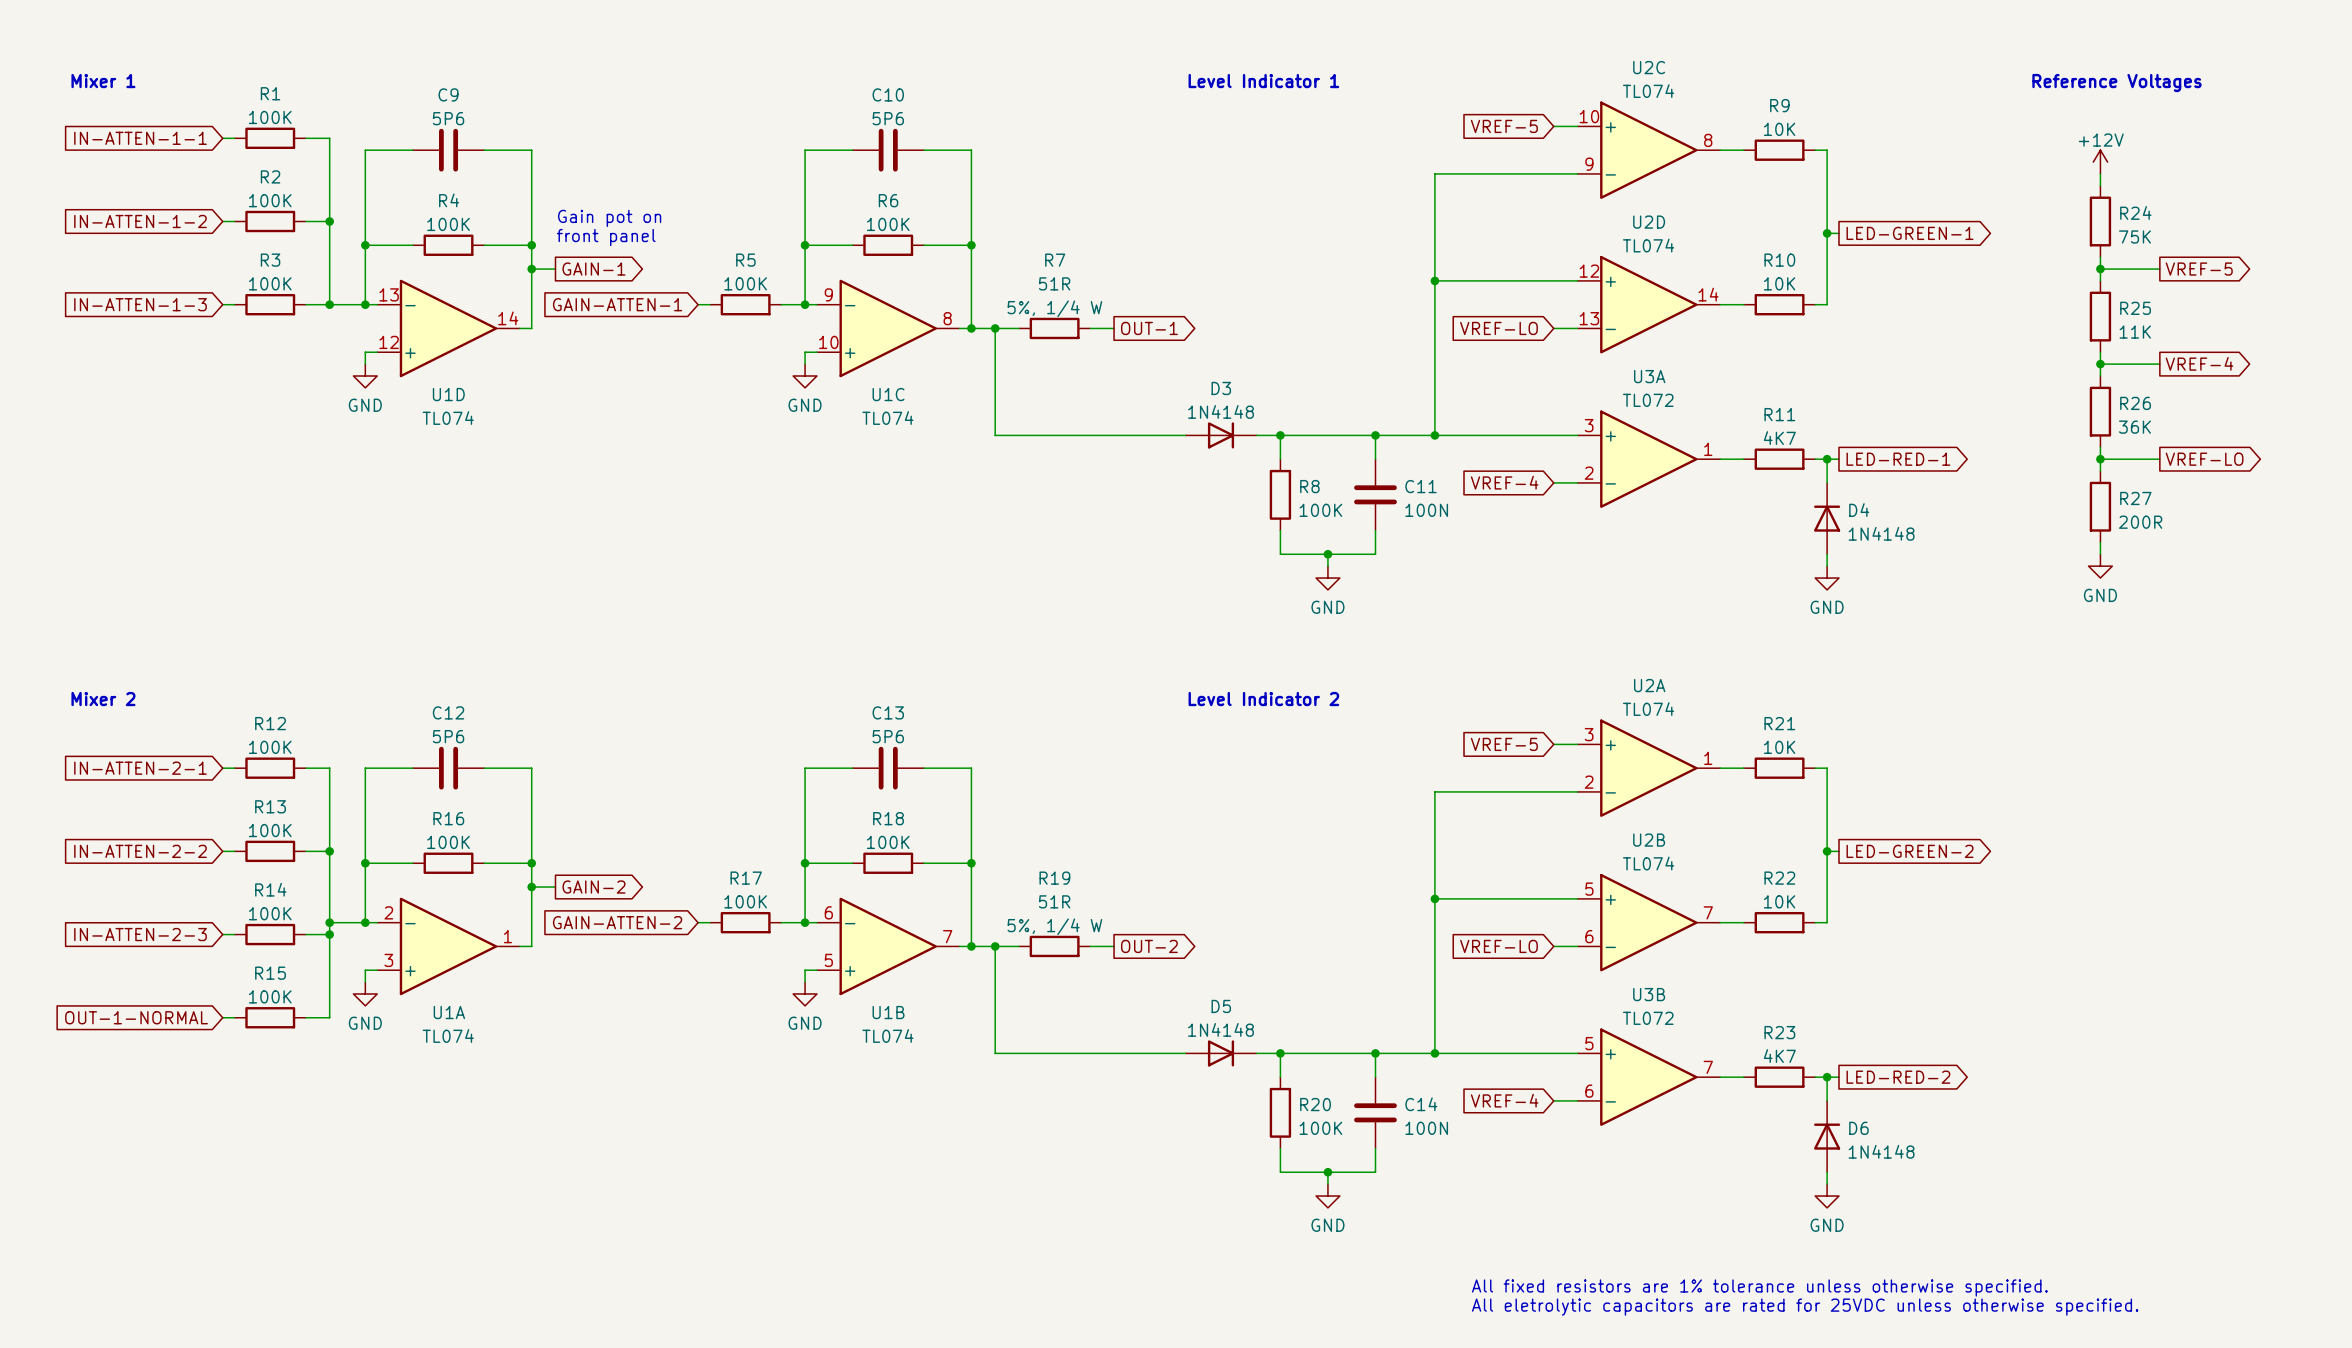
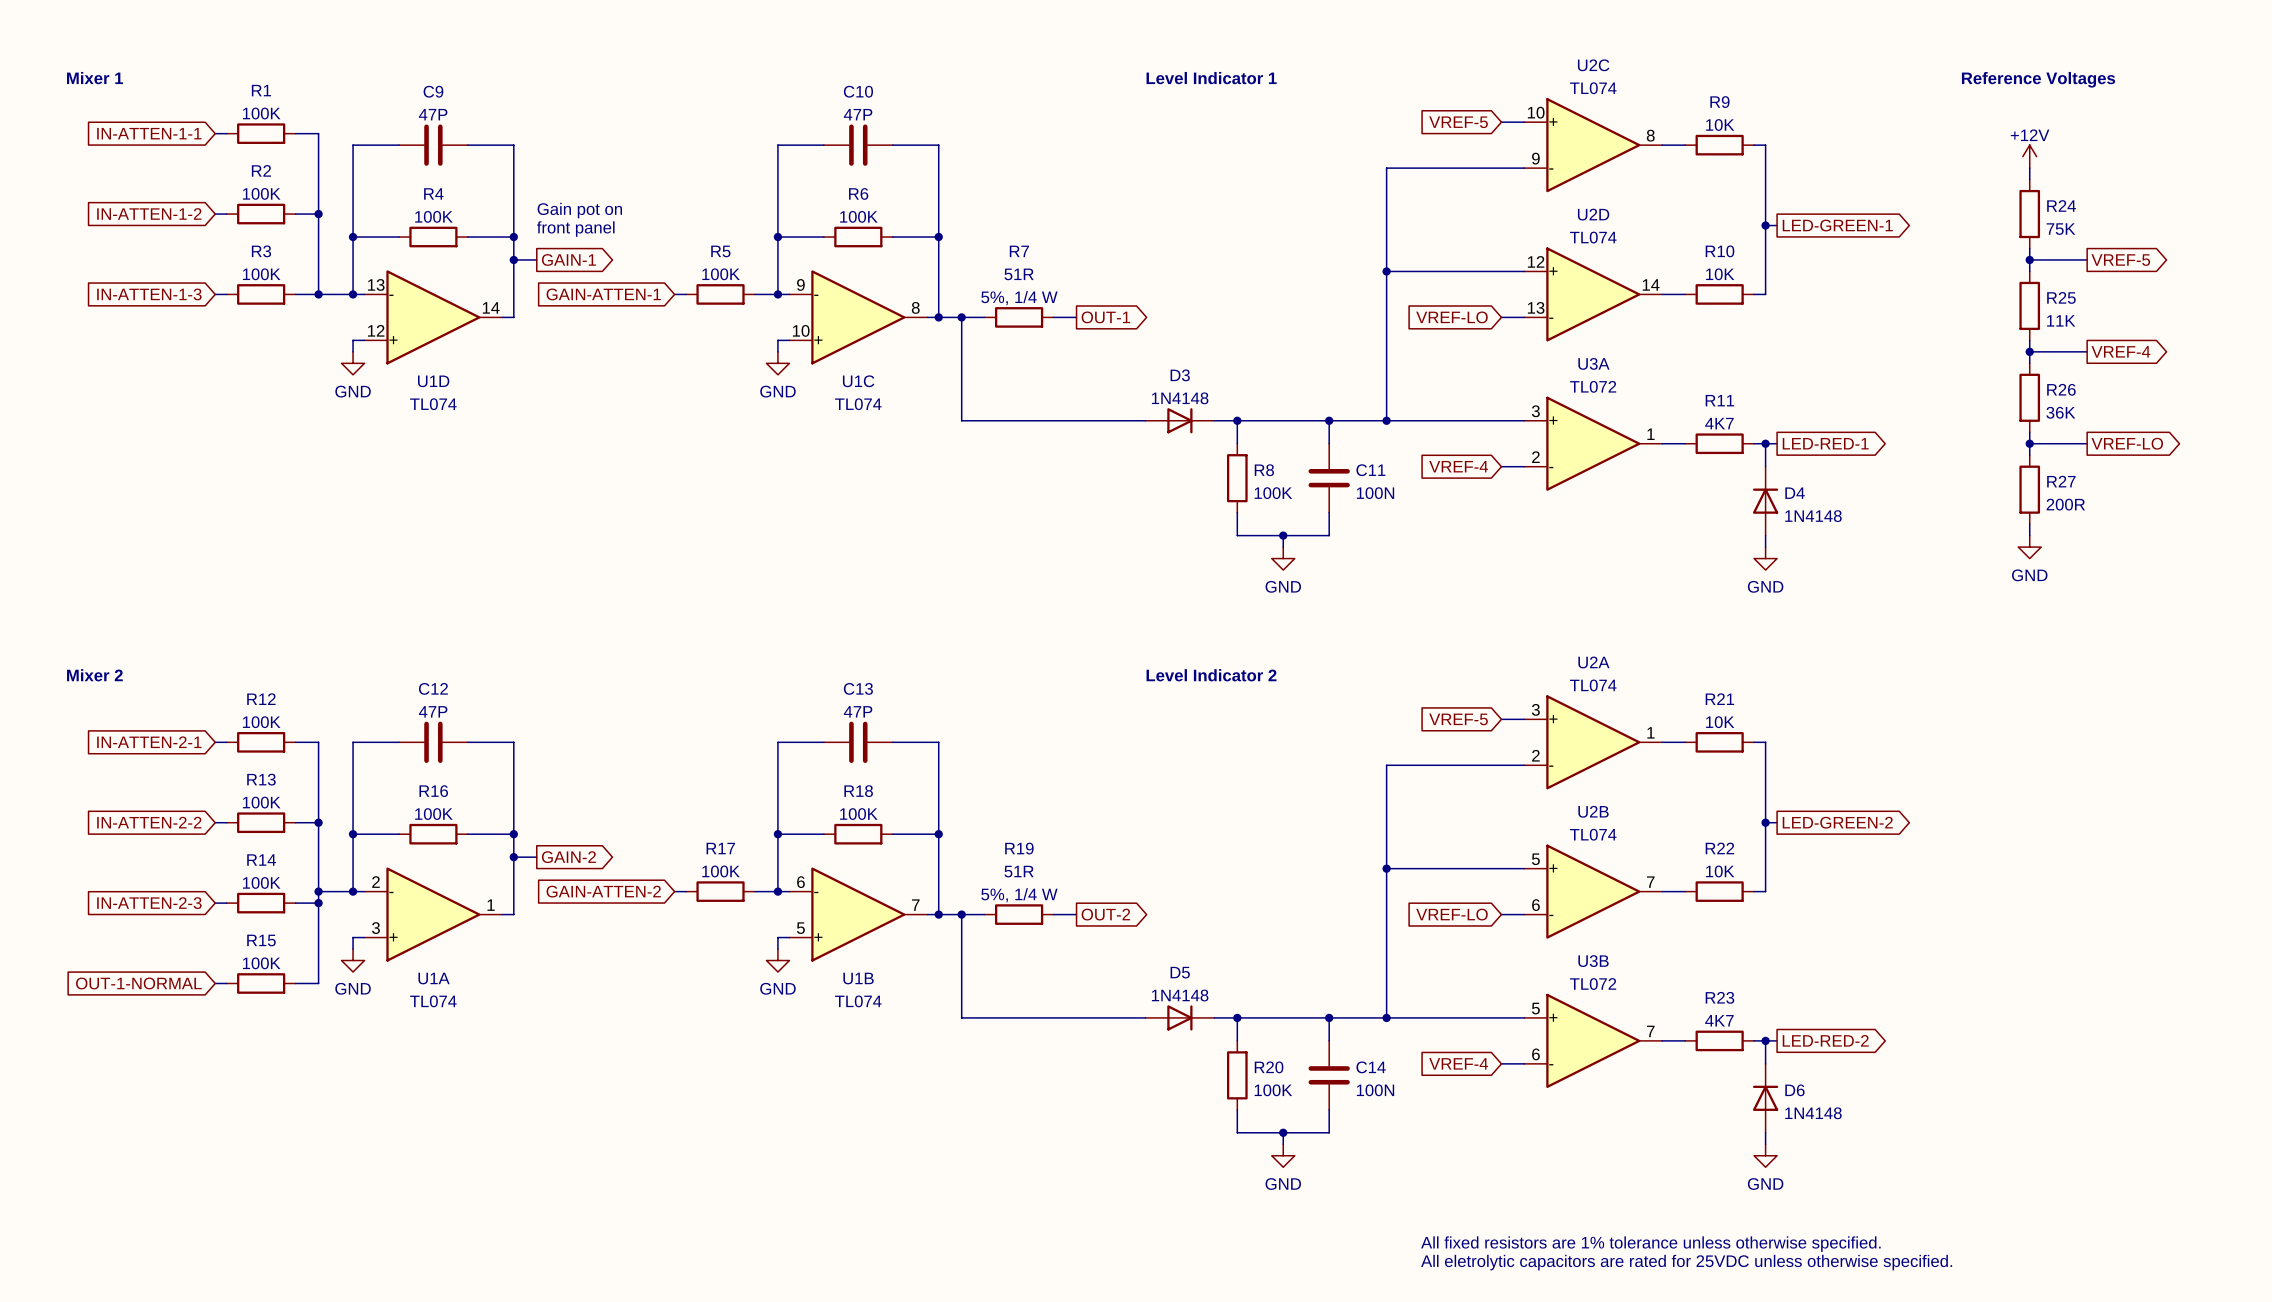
C9 value: 5P6 (448, 118) -> 47P (433, 114)
C10 value: 5P6 (888, 118) -> 47P (858, 114)
C12 value: 5P6 (448, 736) -> 47P (433, 711)
C13 value: 5P6 (888, 736) -> 47P (858, 711)

